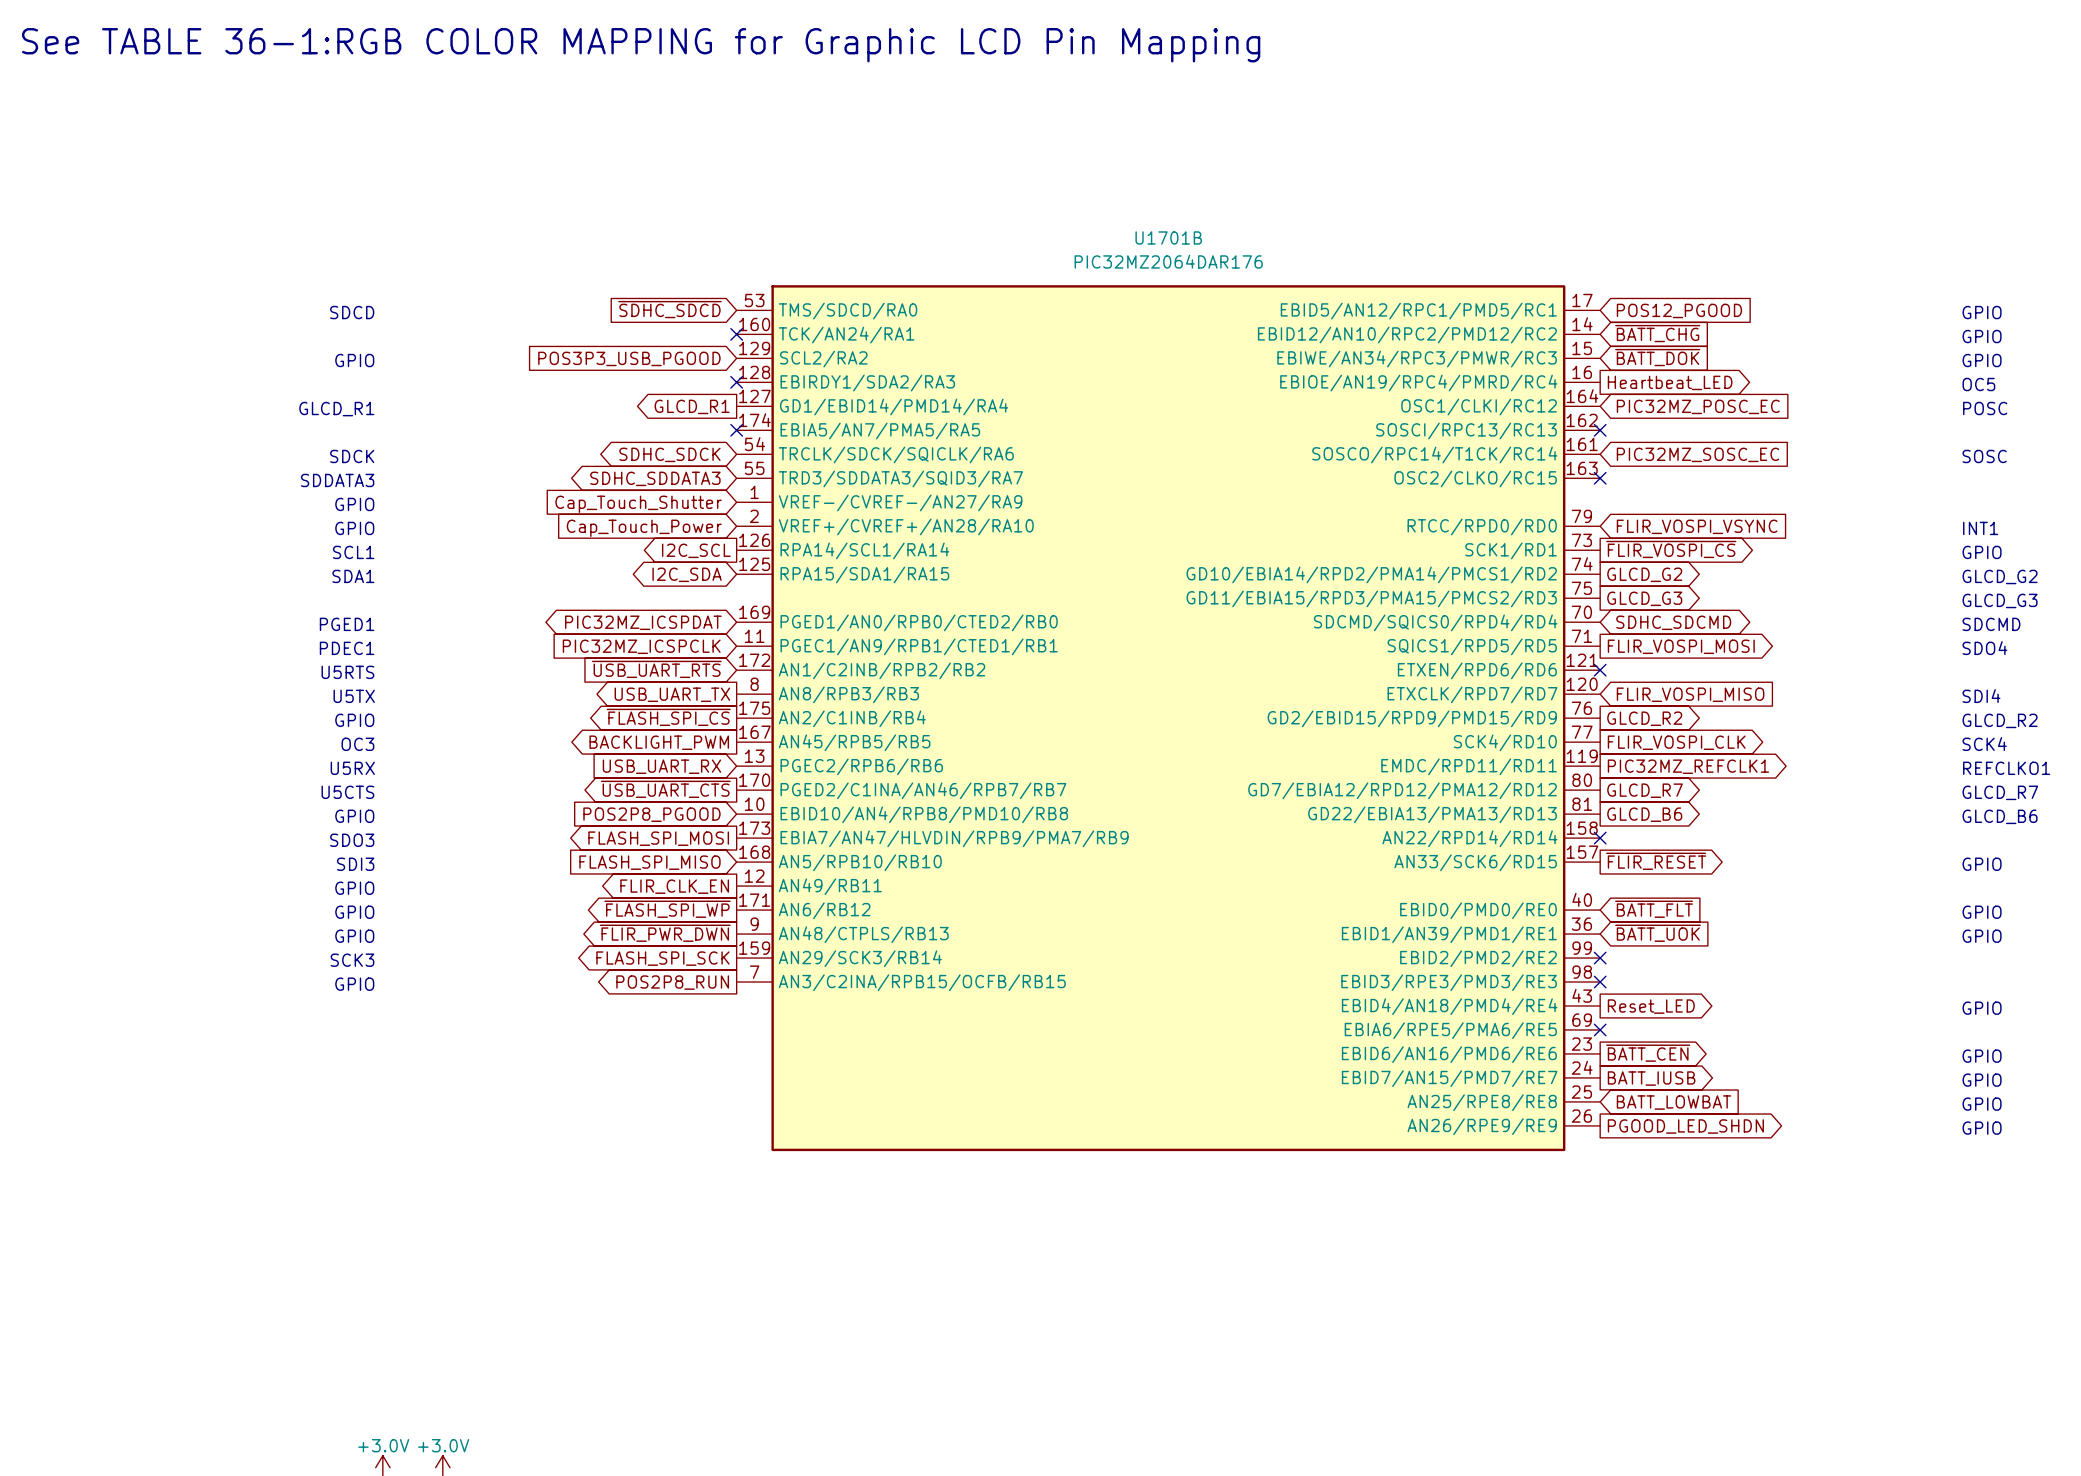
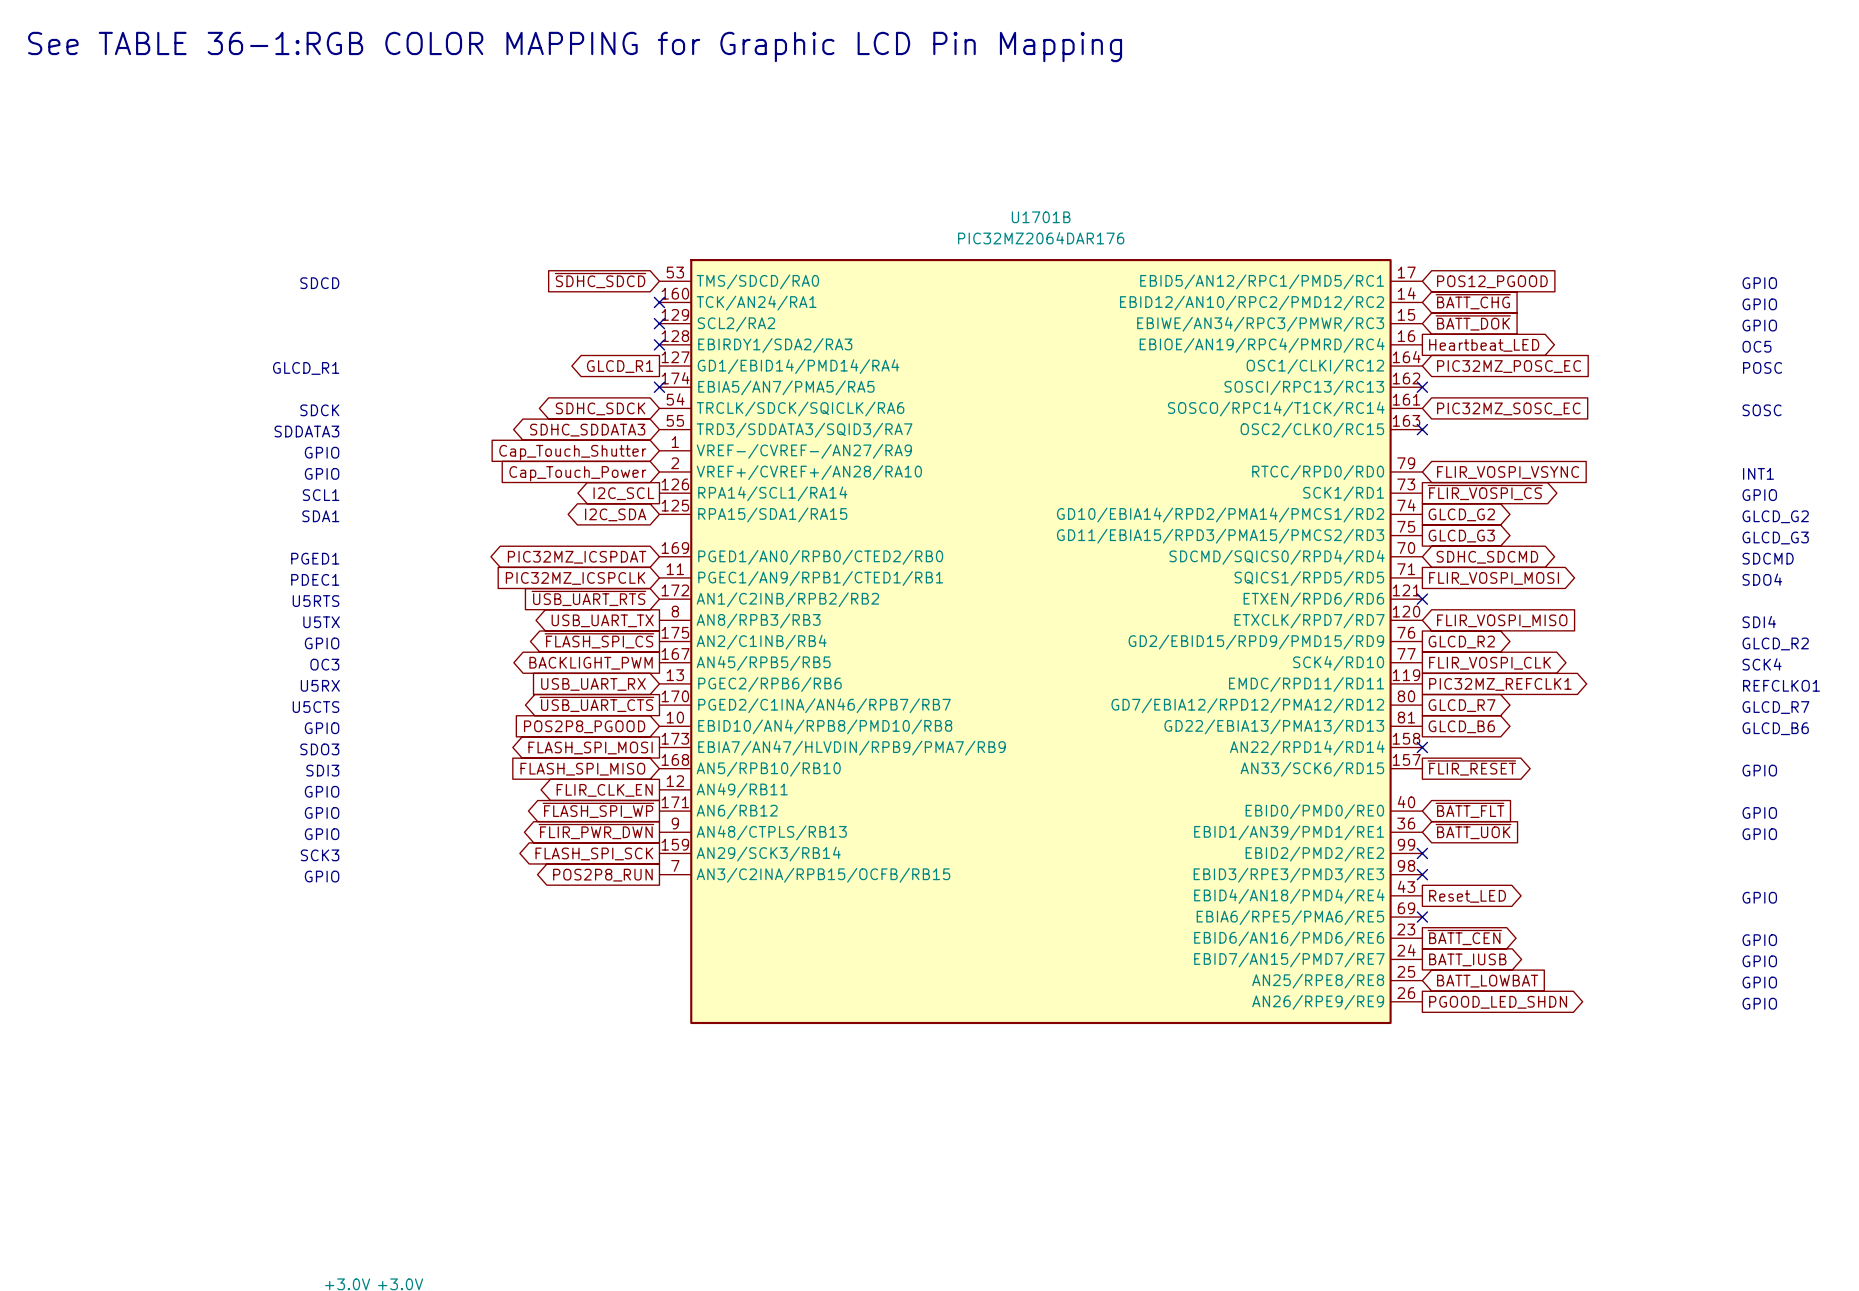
global label: POS3P3_USB_PGOOD (629, 358) -> none
no-connect mark: none -> (659, 323)
text: GPIO (354, 360) -> none

